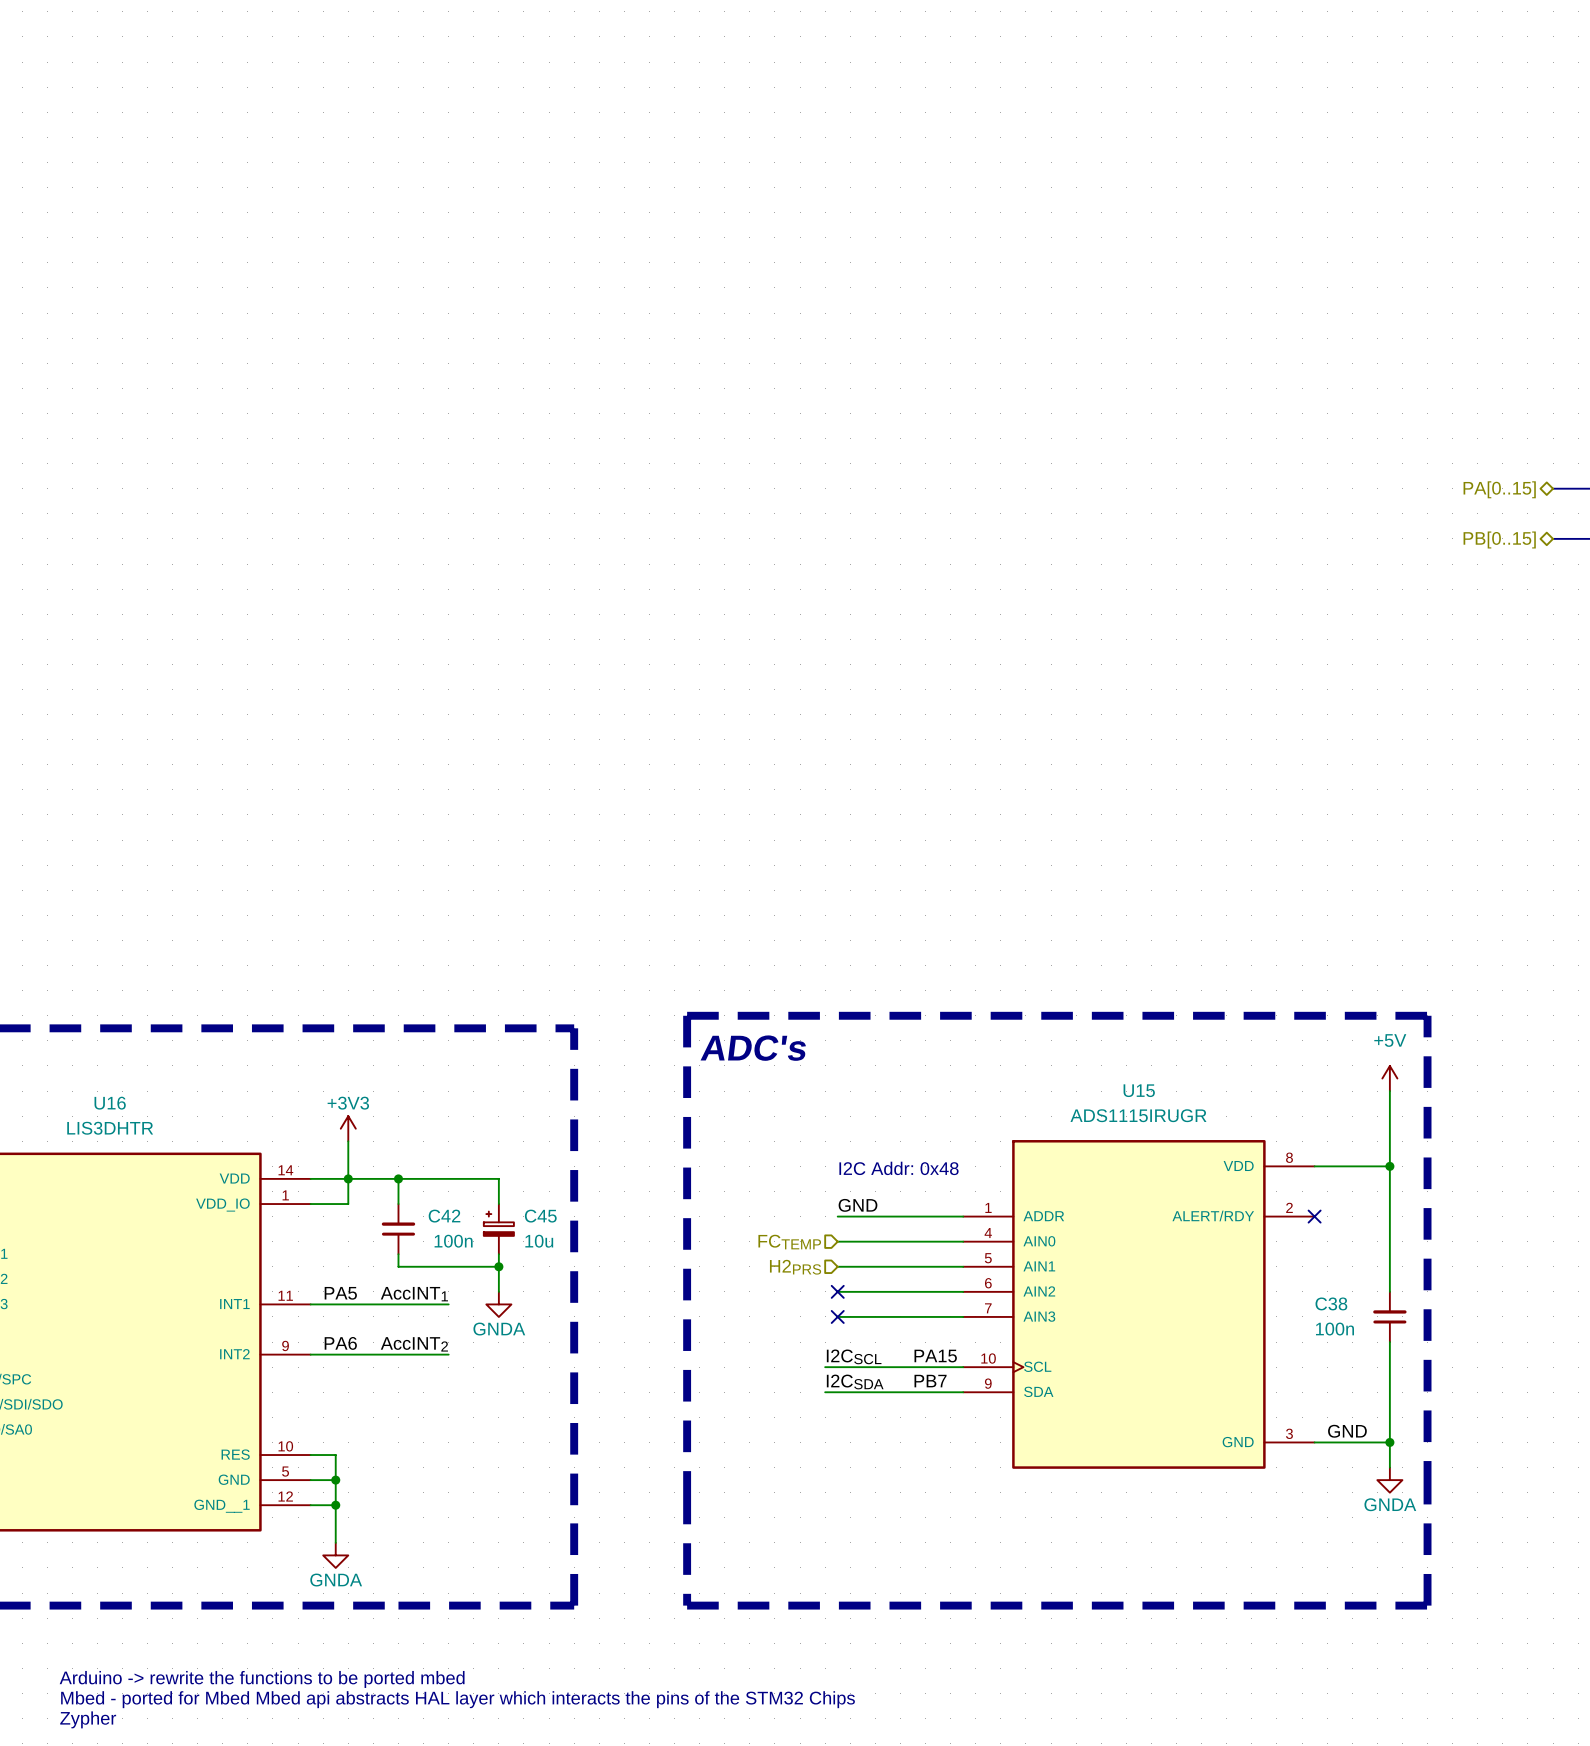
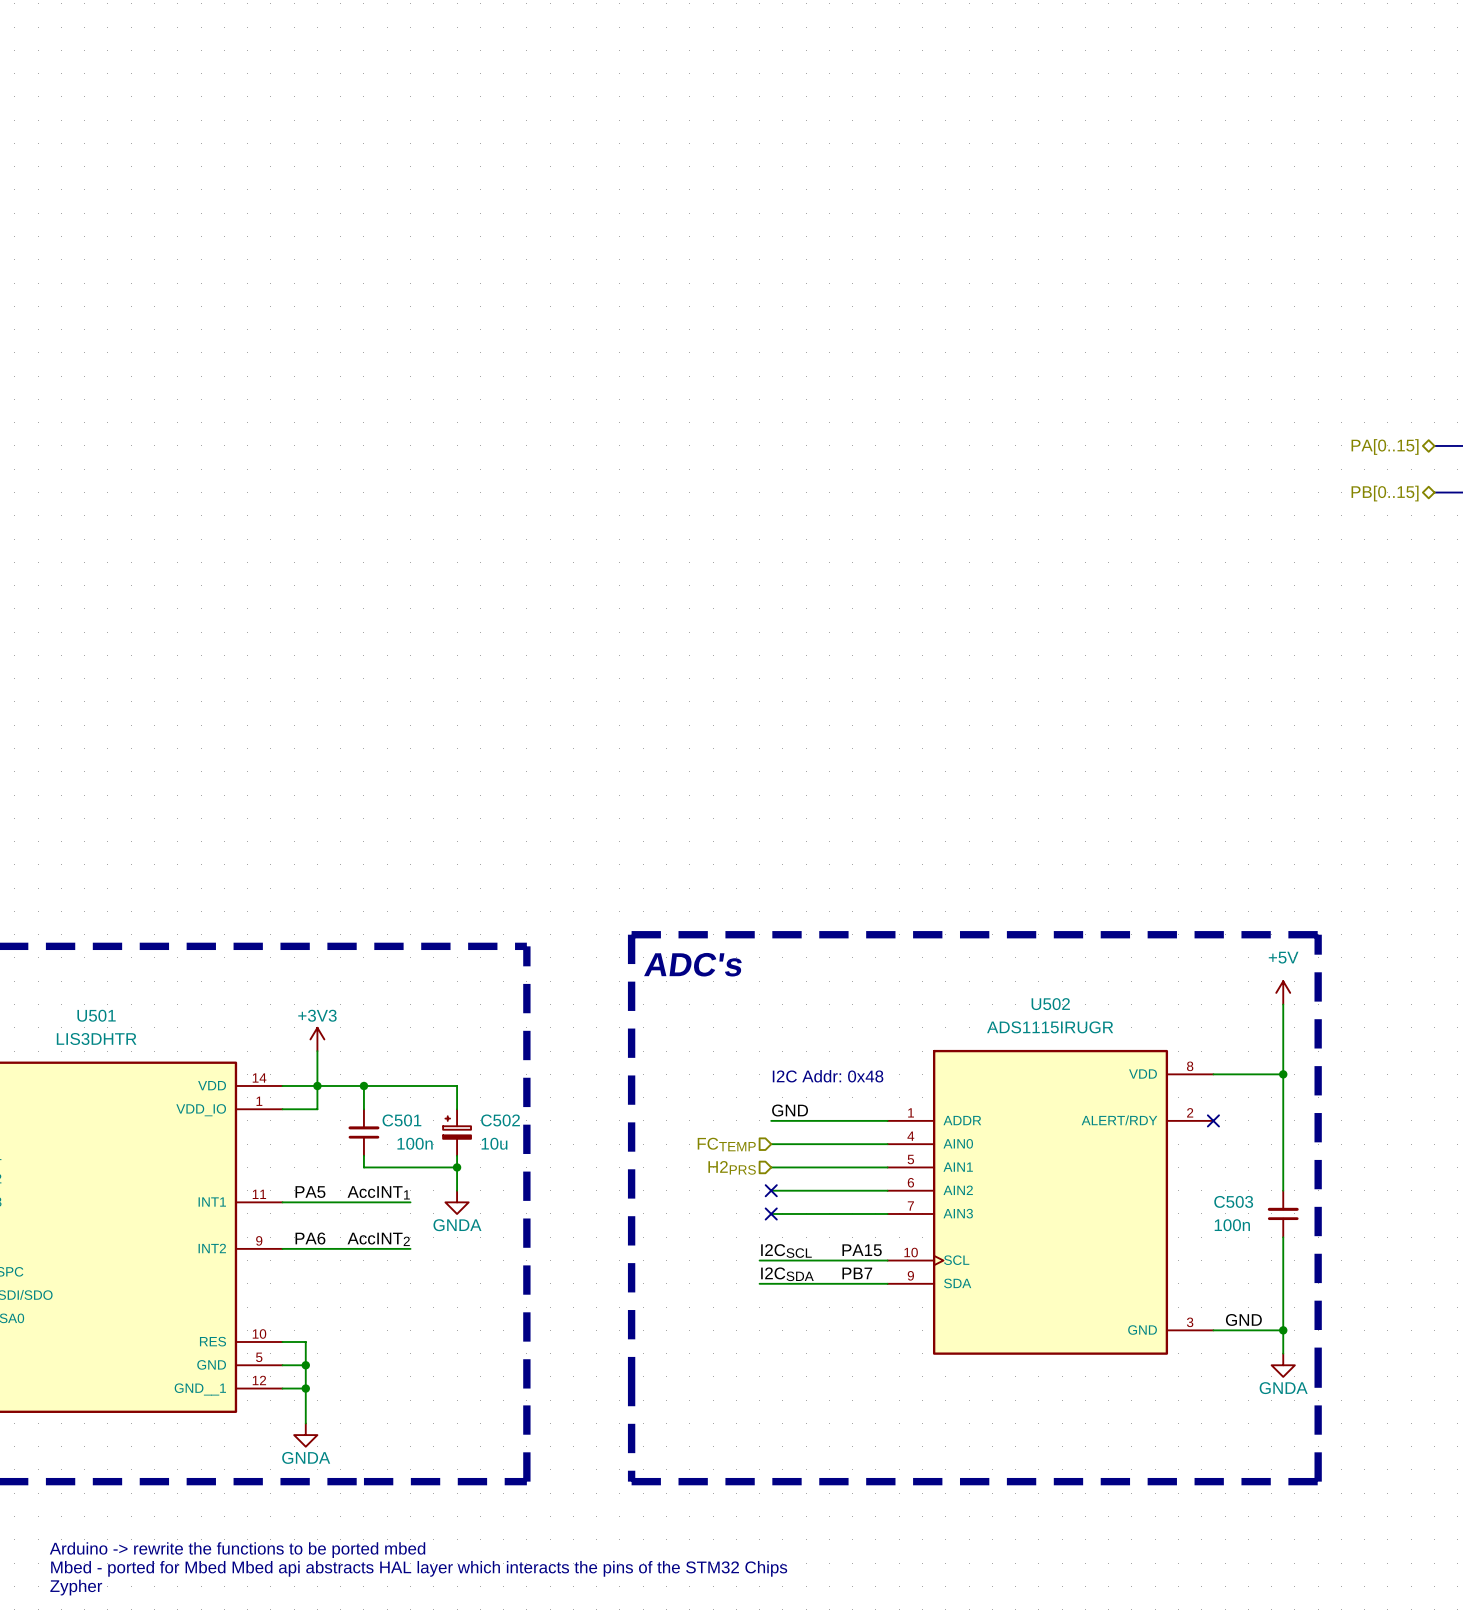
U15 name: U15 (1139, 1090) -> U502 (1050, 1004)
U16 name: U16 (110, 1103) -> U501 (96, 1015)
C42 name: C42 (444, 1216) -> C501 (401, 1120)
C45 name: C45 (540, 1216) -> C502 (500, 1120)
C38 name: C38 (1331, 1303) -> C503 (1233, 1201)

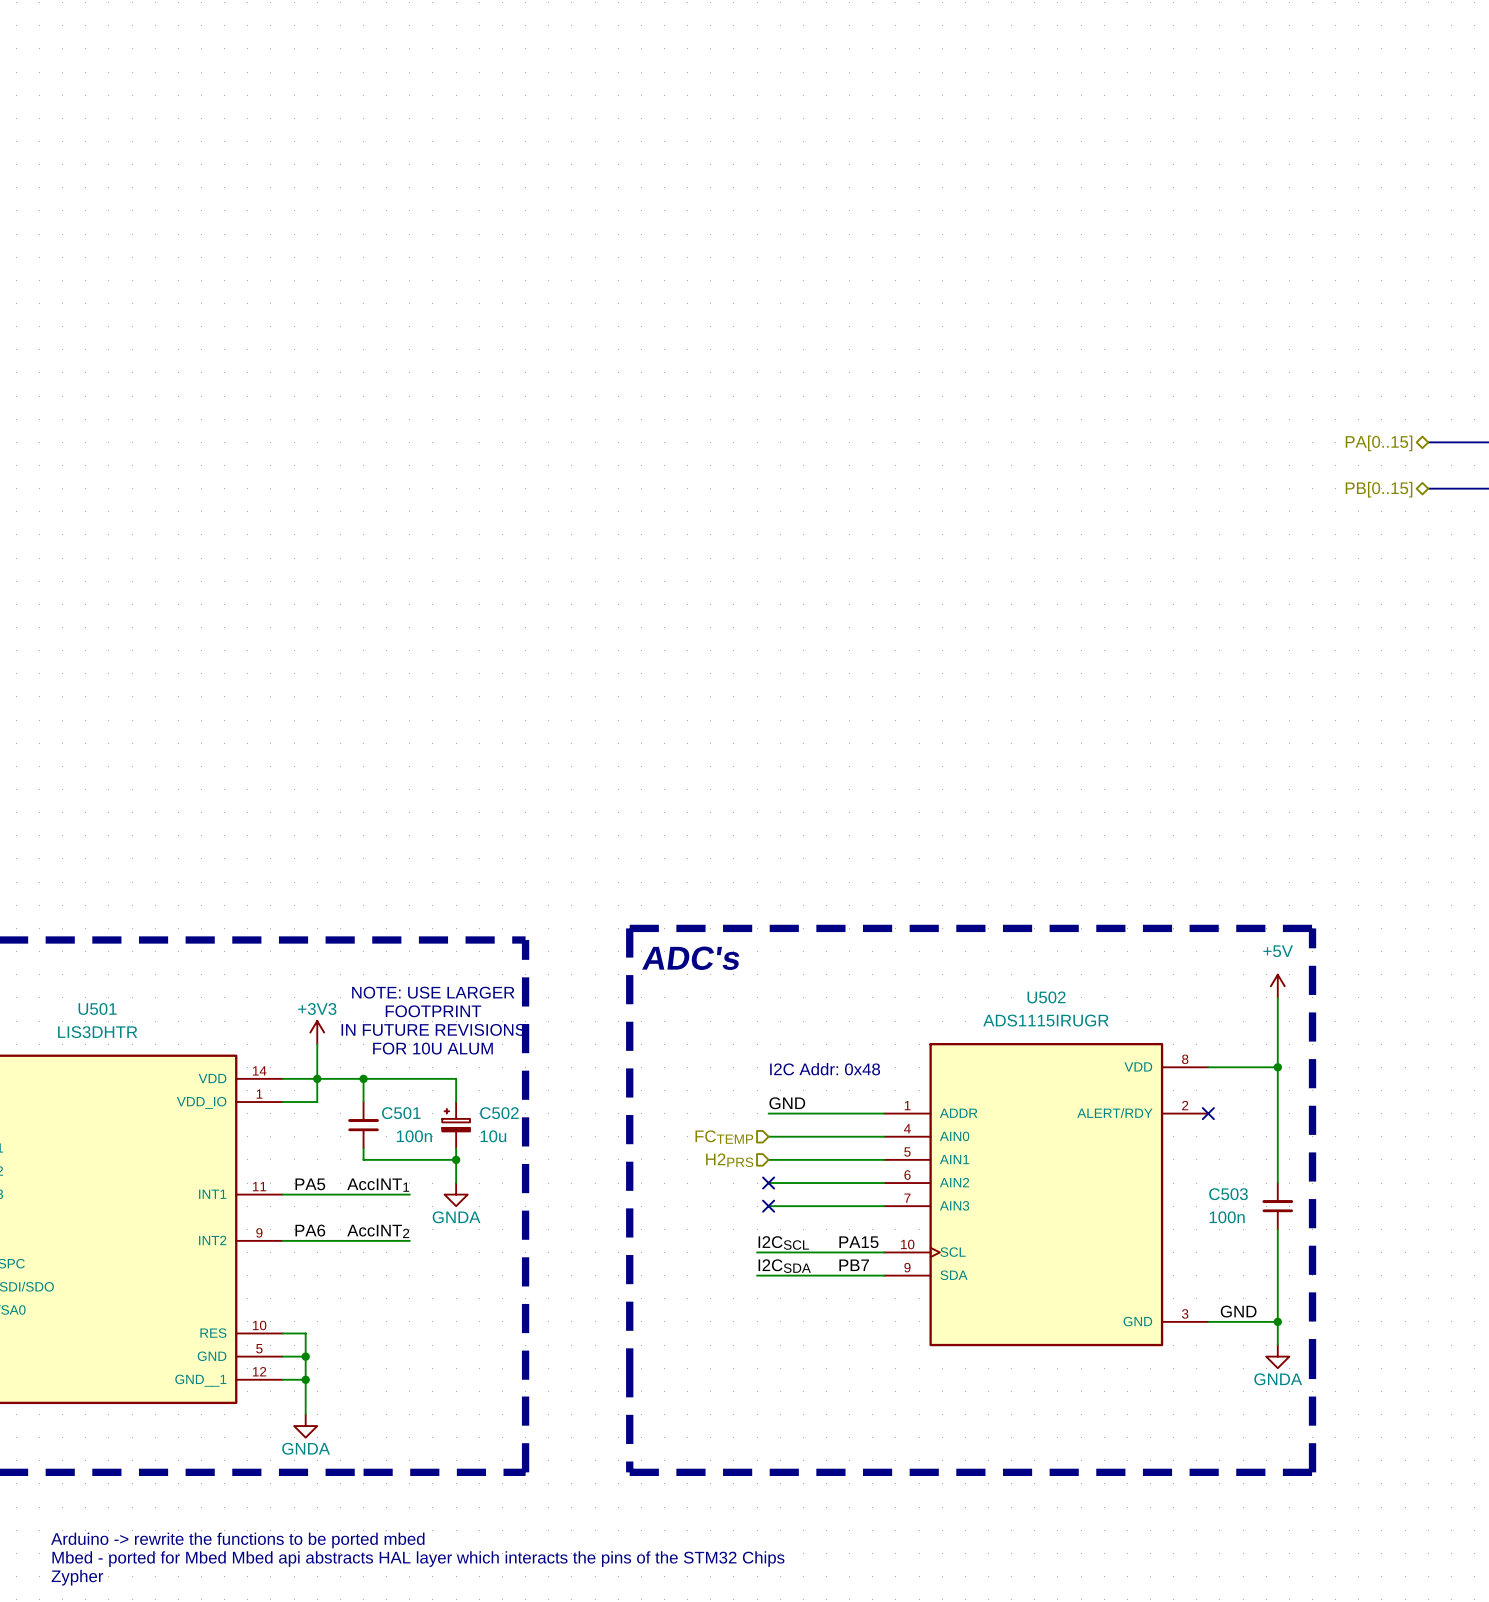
text: none -> NOTE: USE LARGER (433, 992)
text: none -> FOOTPRINT (433, 1011)
text: none -> IN FUTURE REVISIONS (433, 1029)
text: none -> FOR 10U ALUM (432, 1048)

